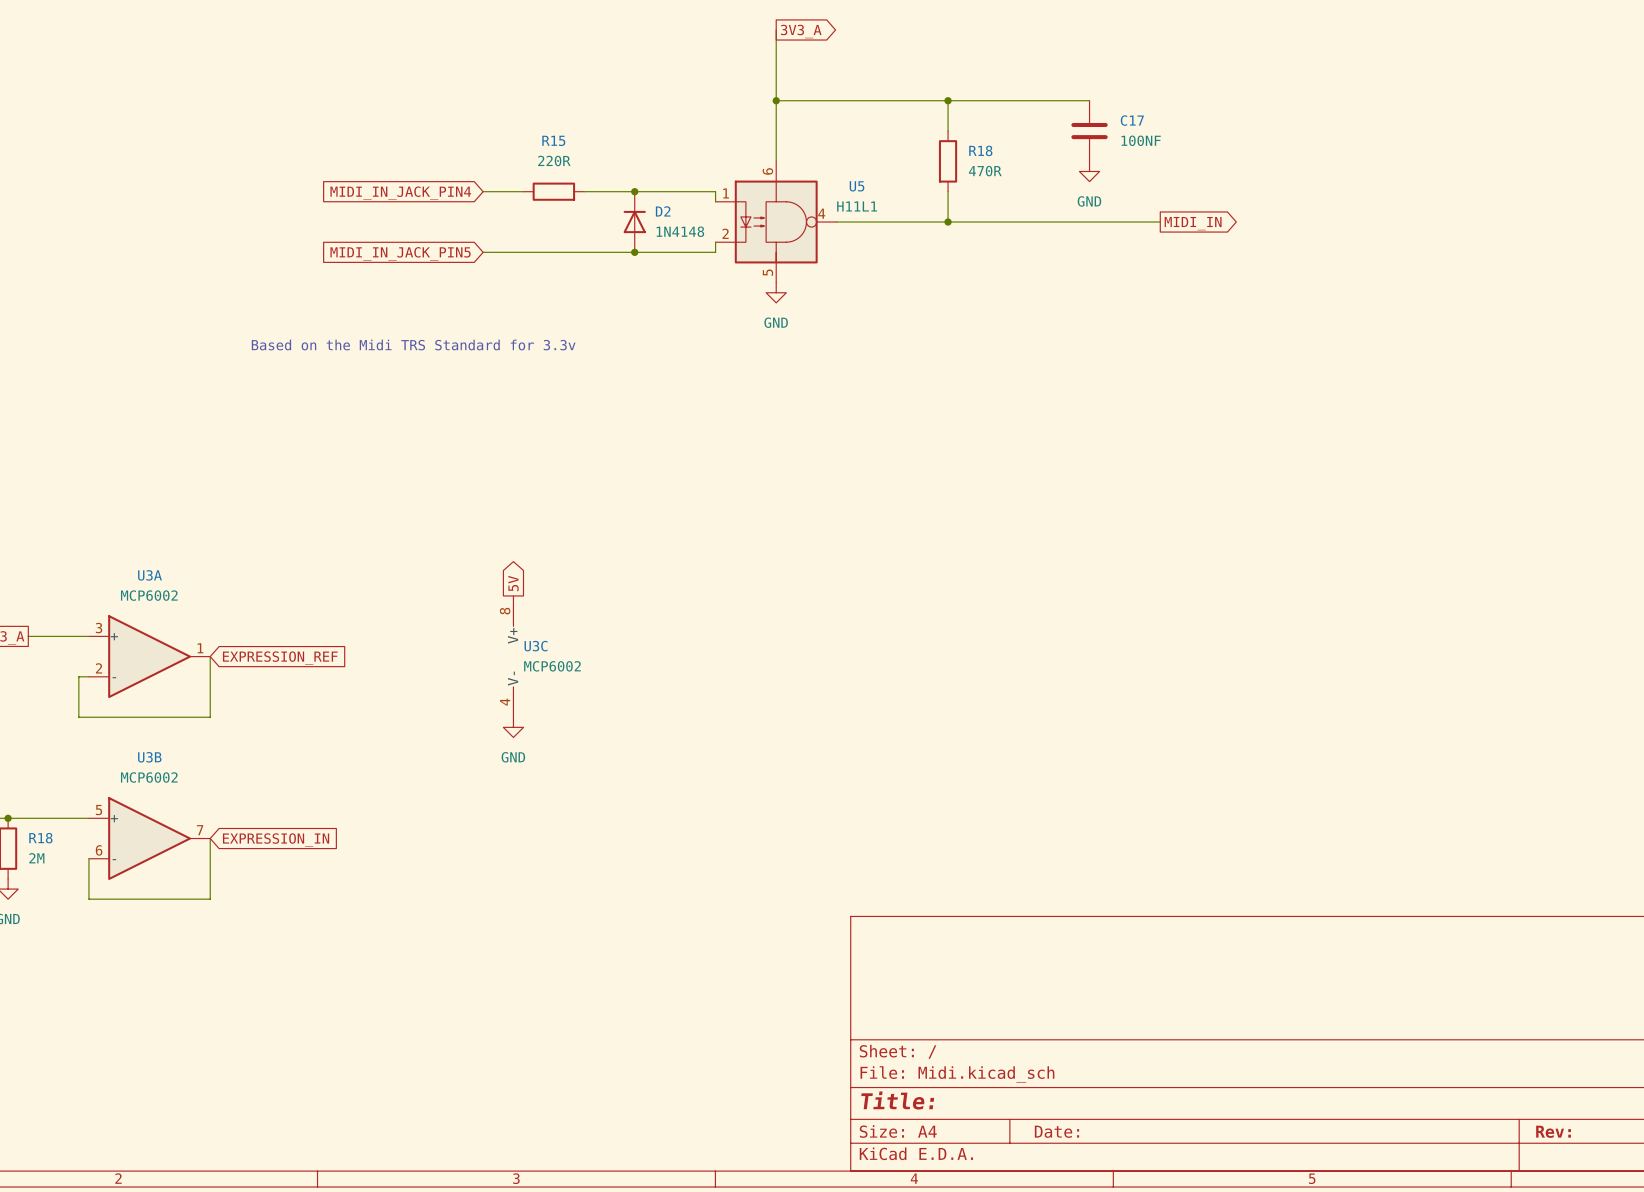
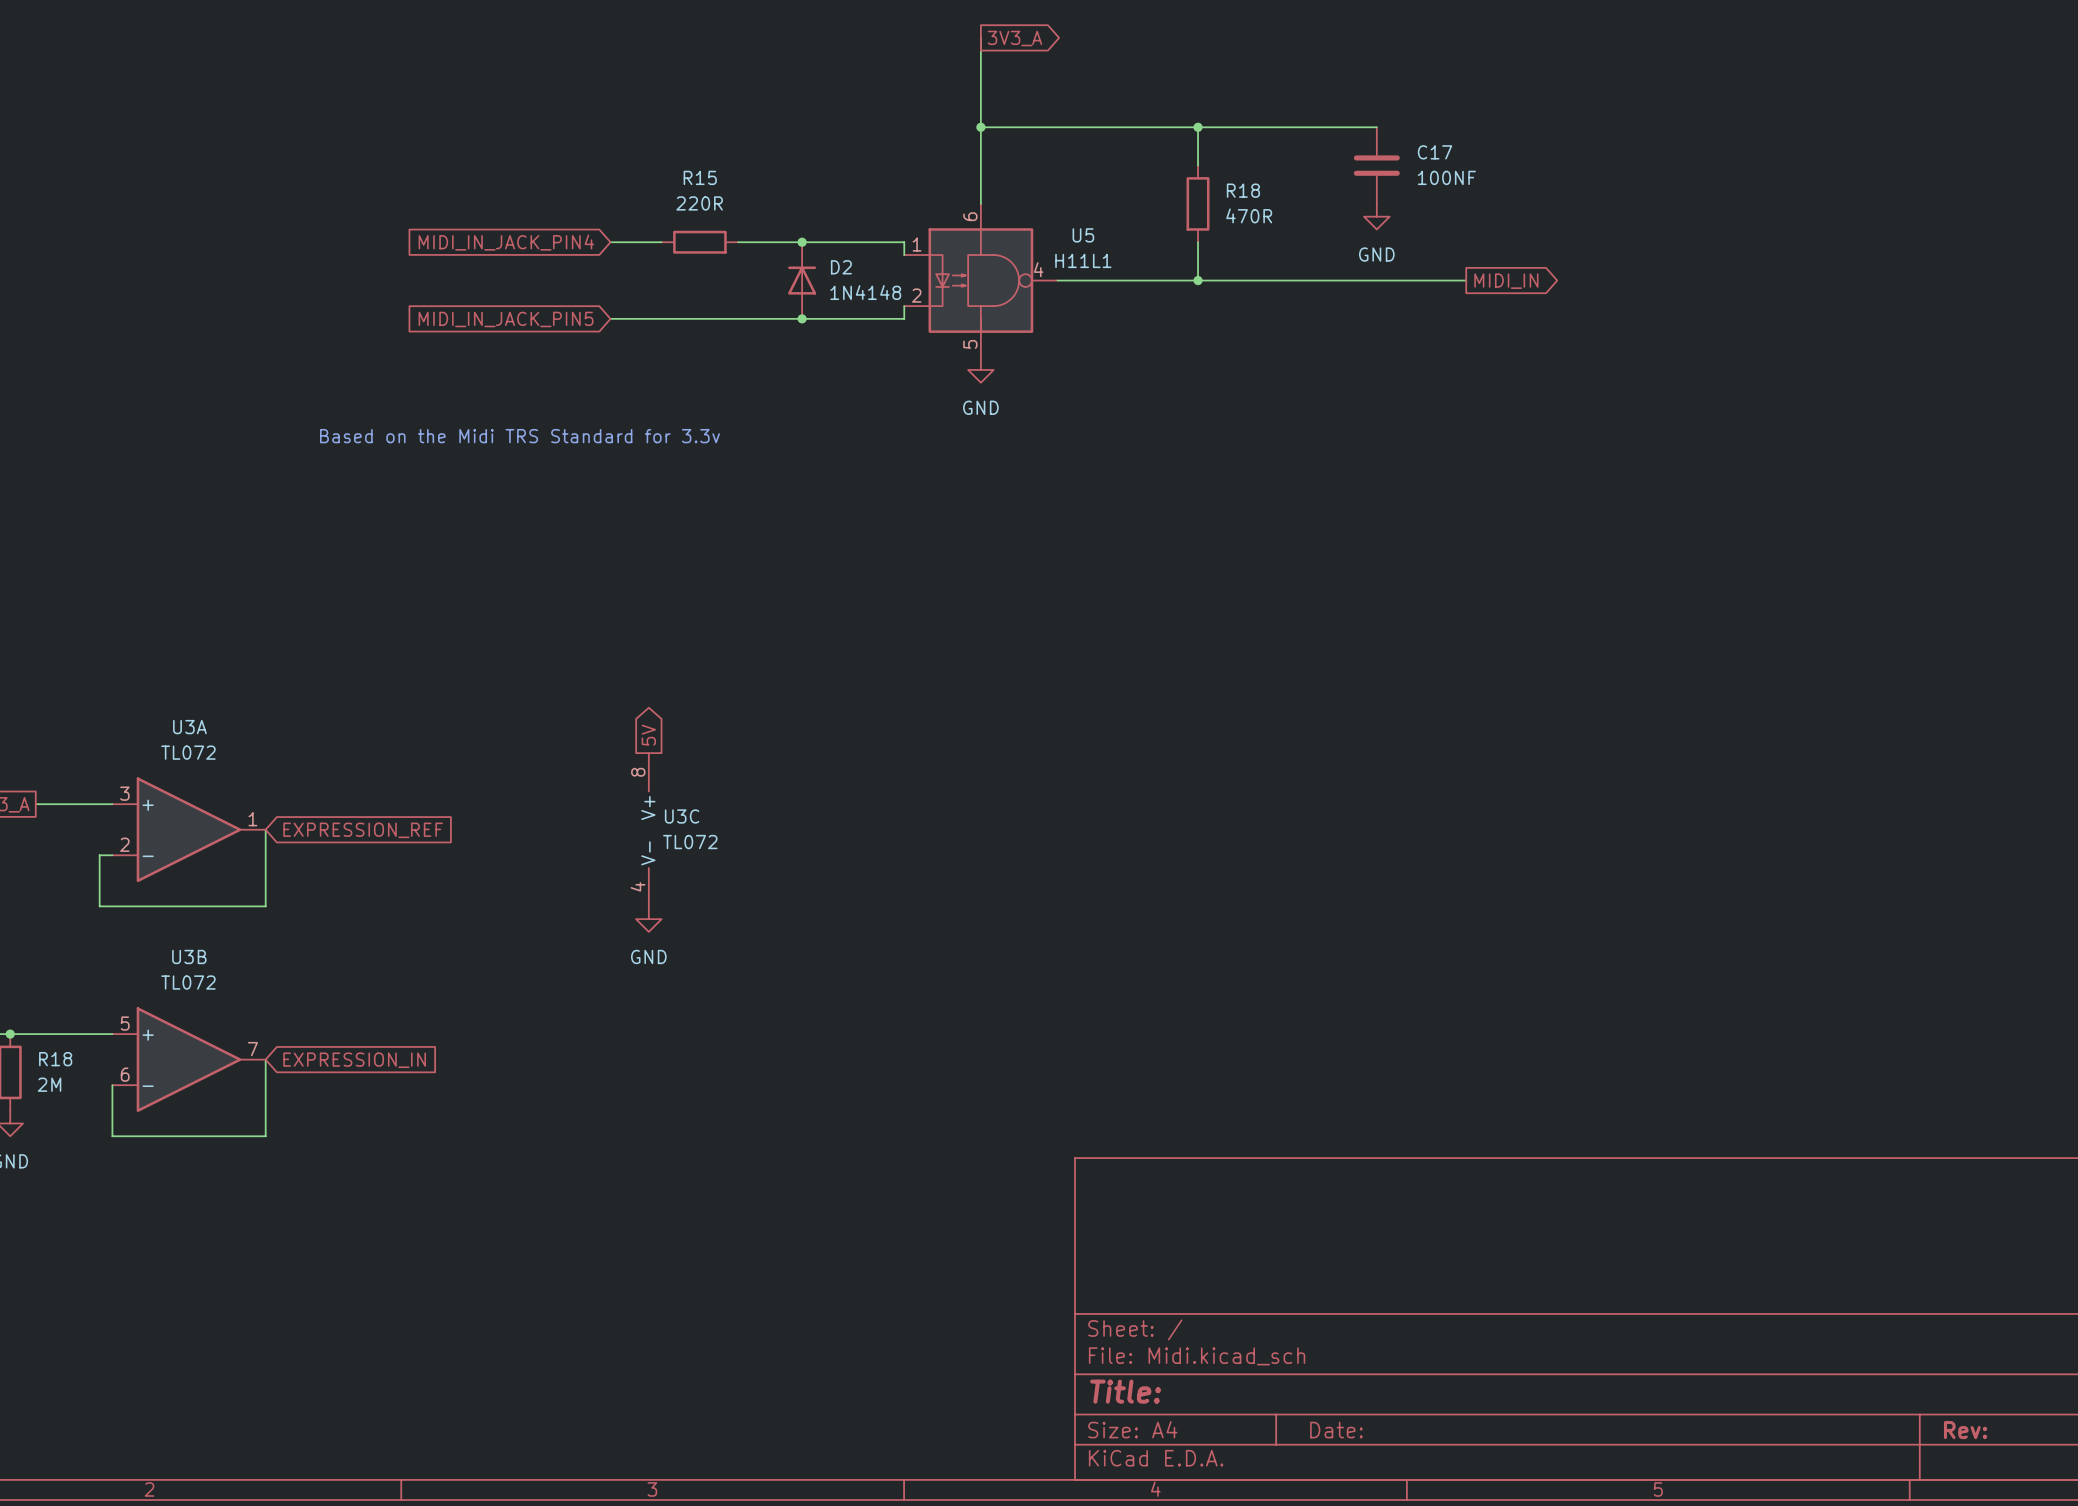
U3A value: MCP6002 (149, 595) -> TL072 (188, 752)
U3C value: MCP6002 (552, 666) -> TL072 (690, 842)
U3B value: MCP6002 (149, 777) -> TL072 (188, 982)

